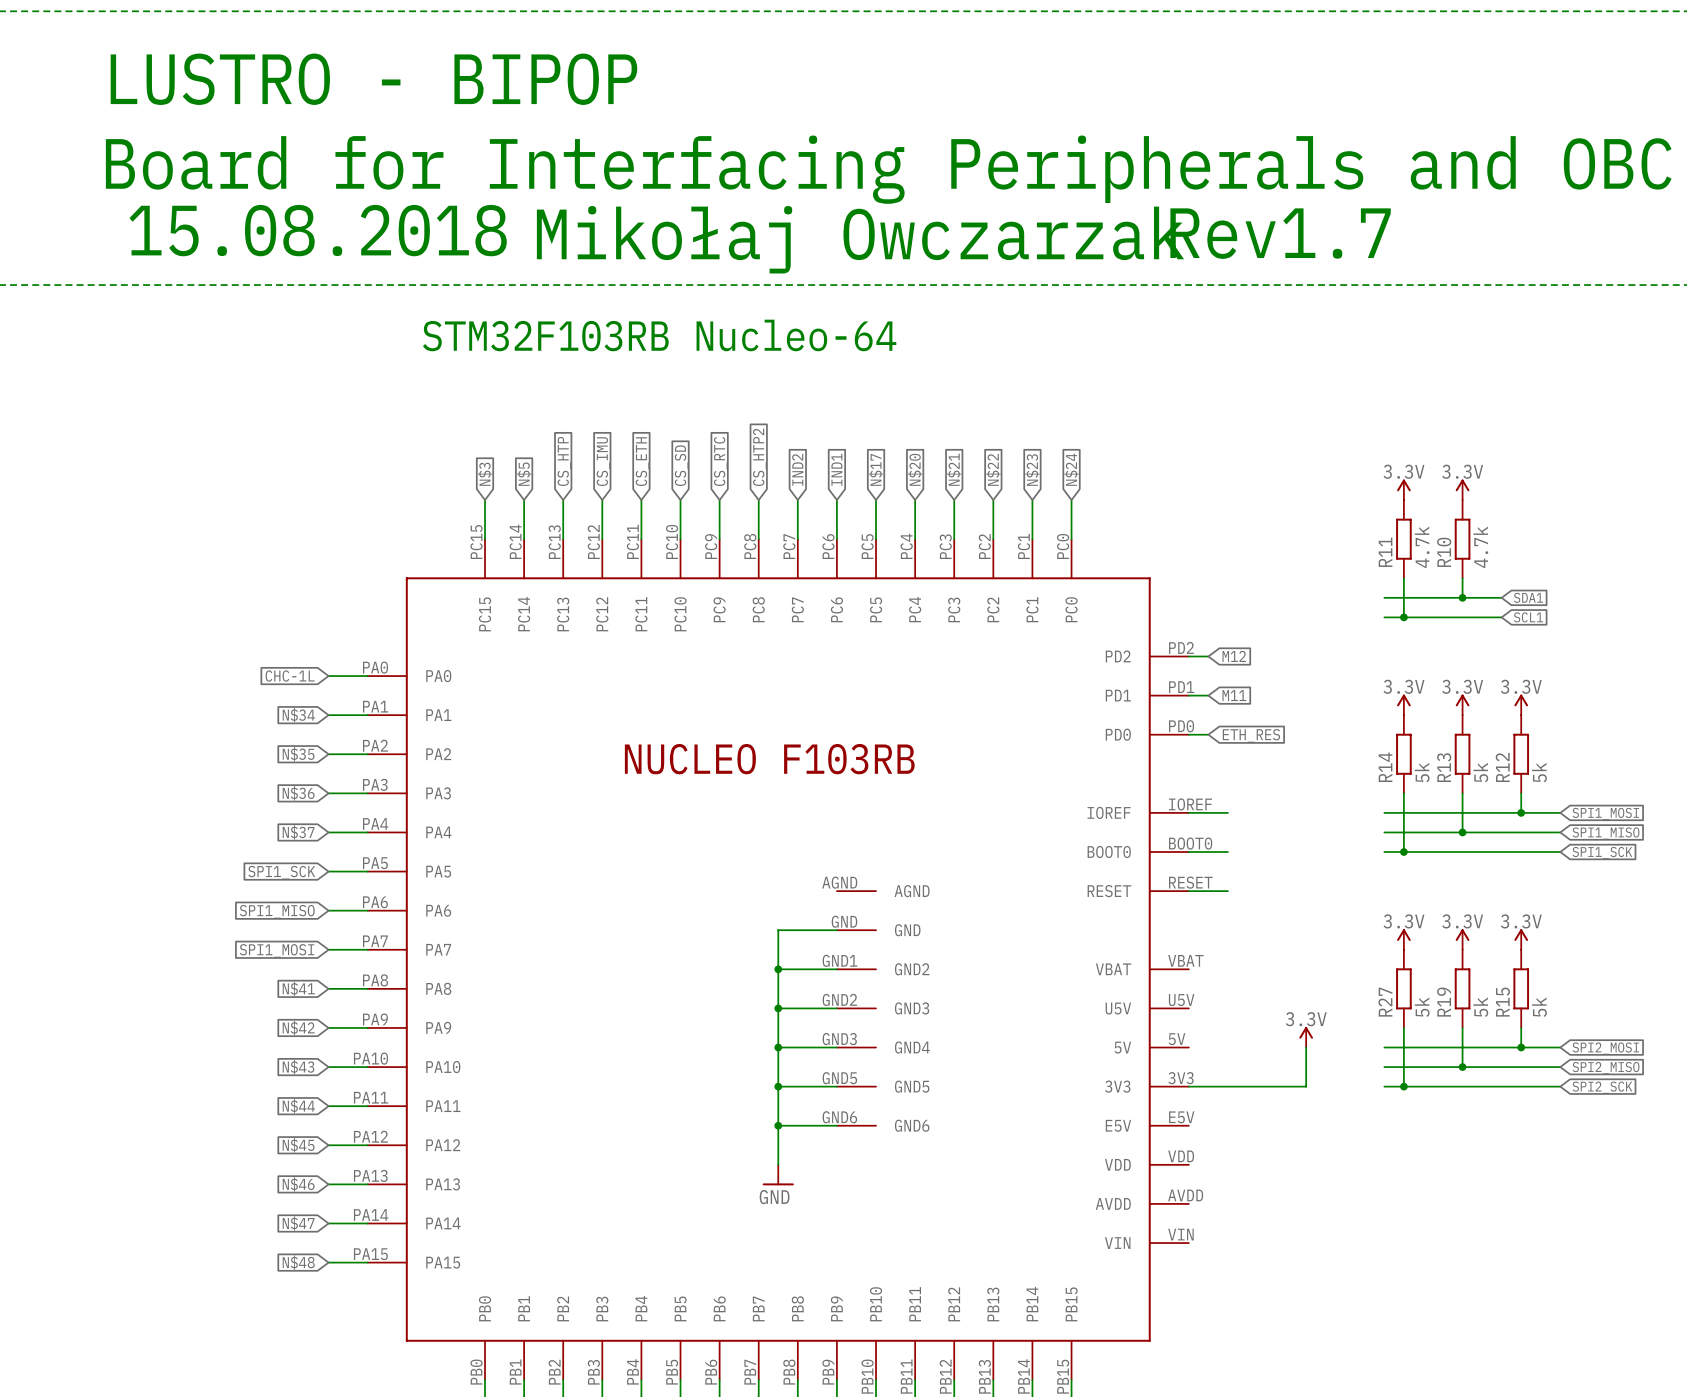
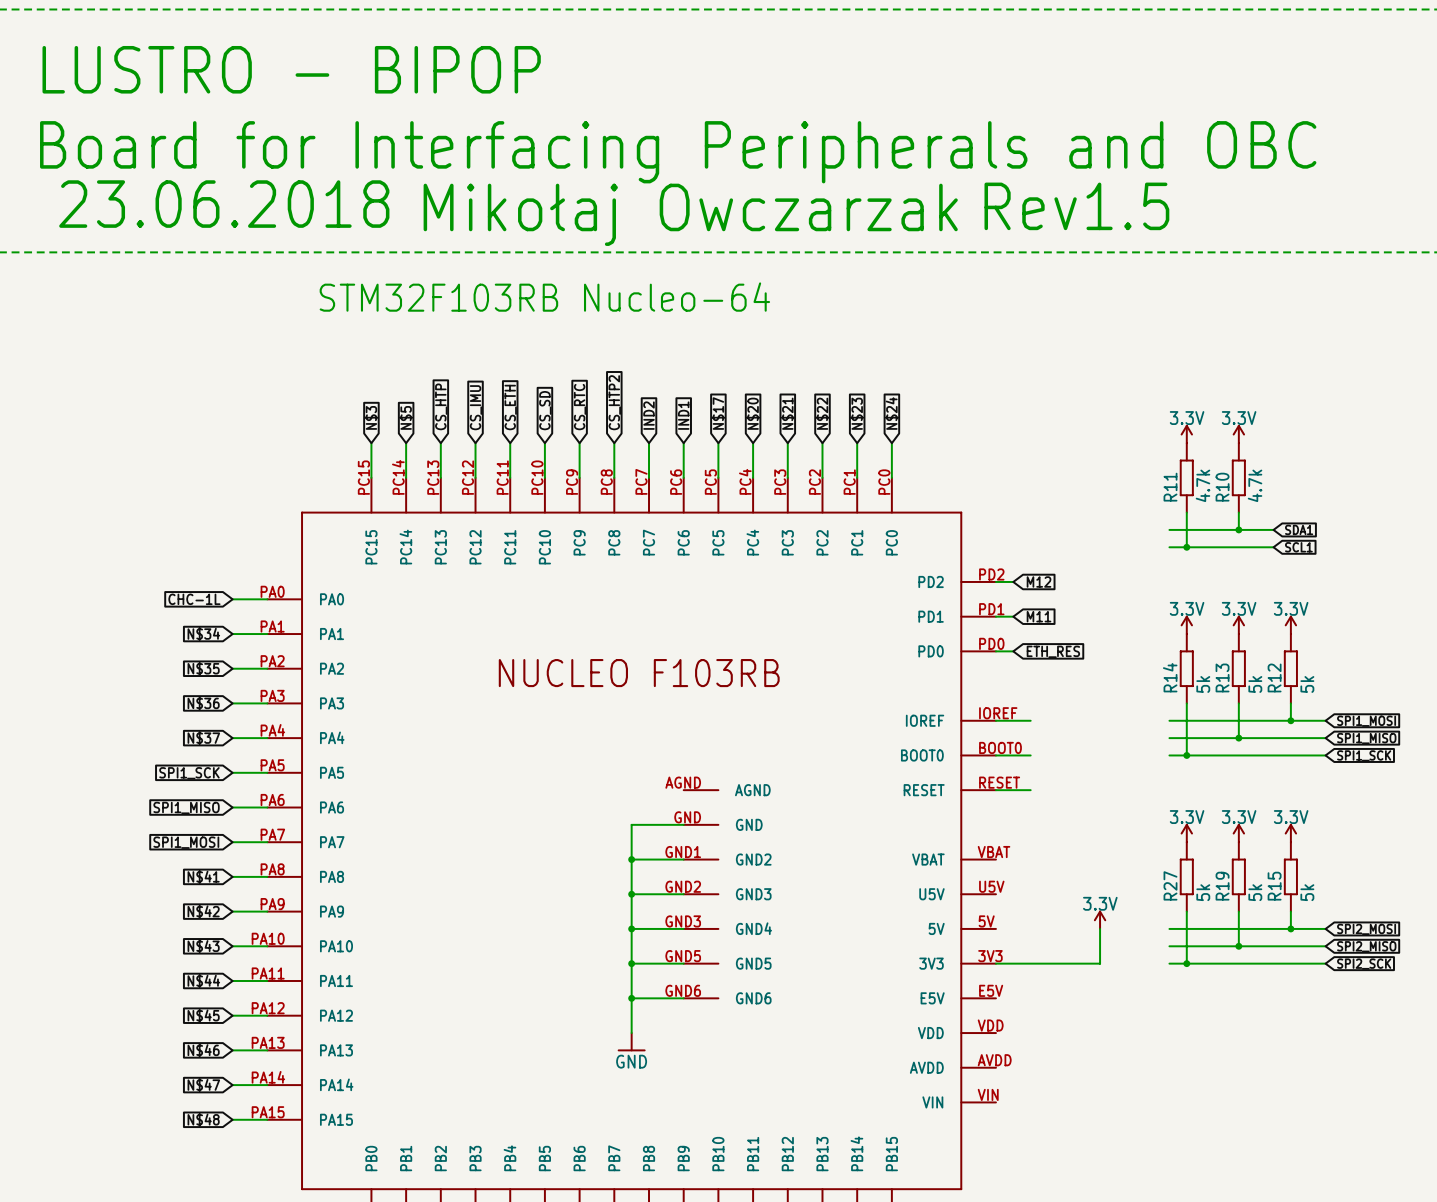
text: 15.08.2018 (318, 230) -> 23.06.2018 (224, 204)
text: Rev1.7 (1280, 233) -> Rev1.5 (1076, 206)

